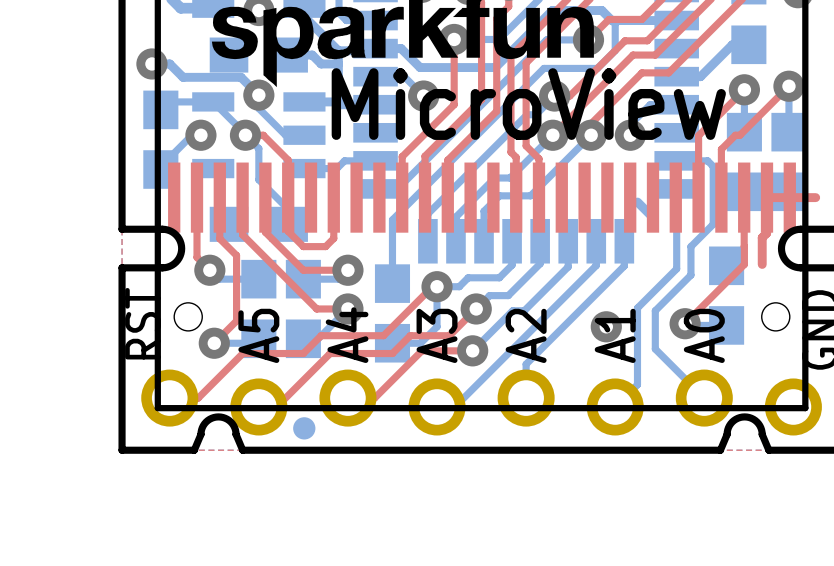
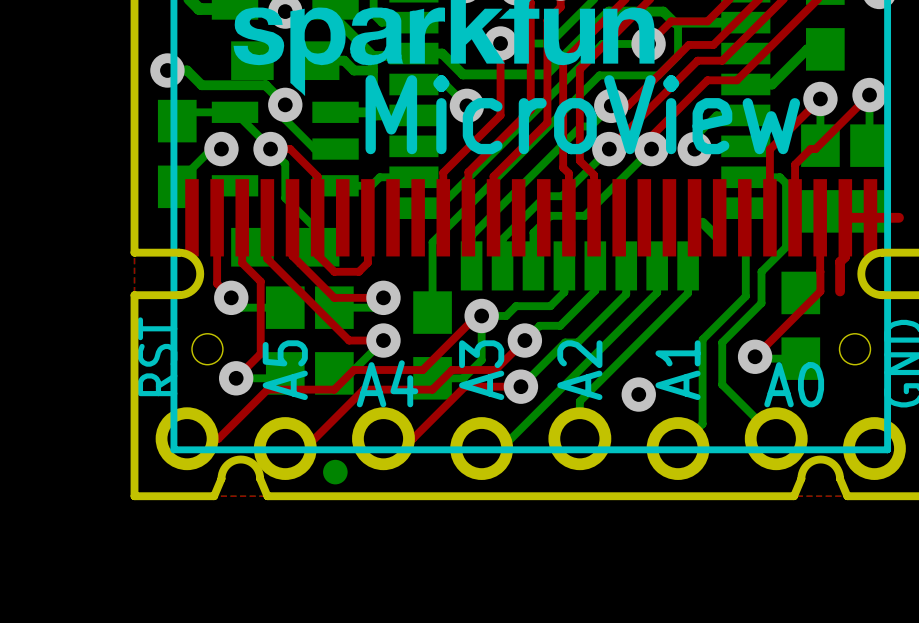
via position: (606, 326) -> (638, 394)
text rotation: 0° (347, 335) -> 90° clockwise (387, 383)
text rotation: 0° (704, 335) -> 90° clockwise (794, 384)

